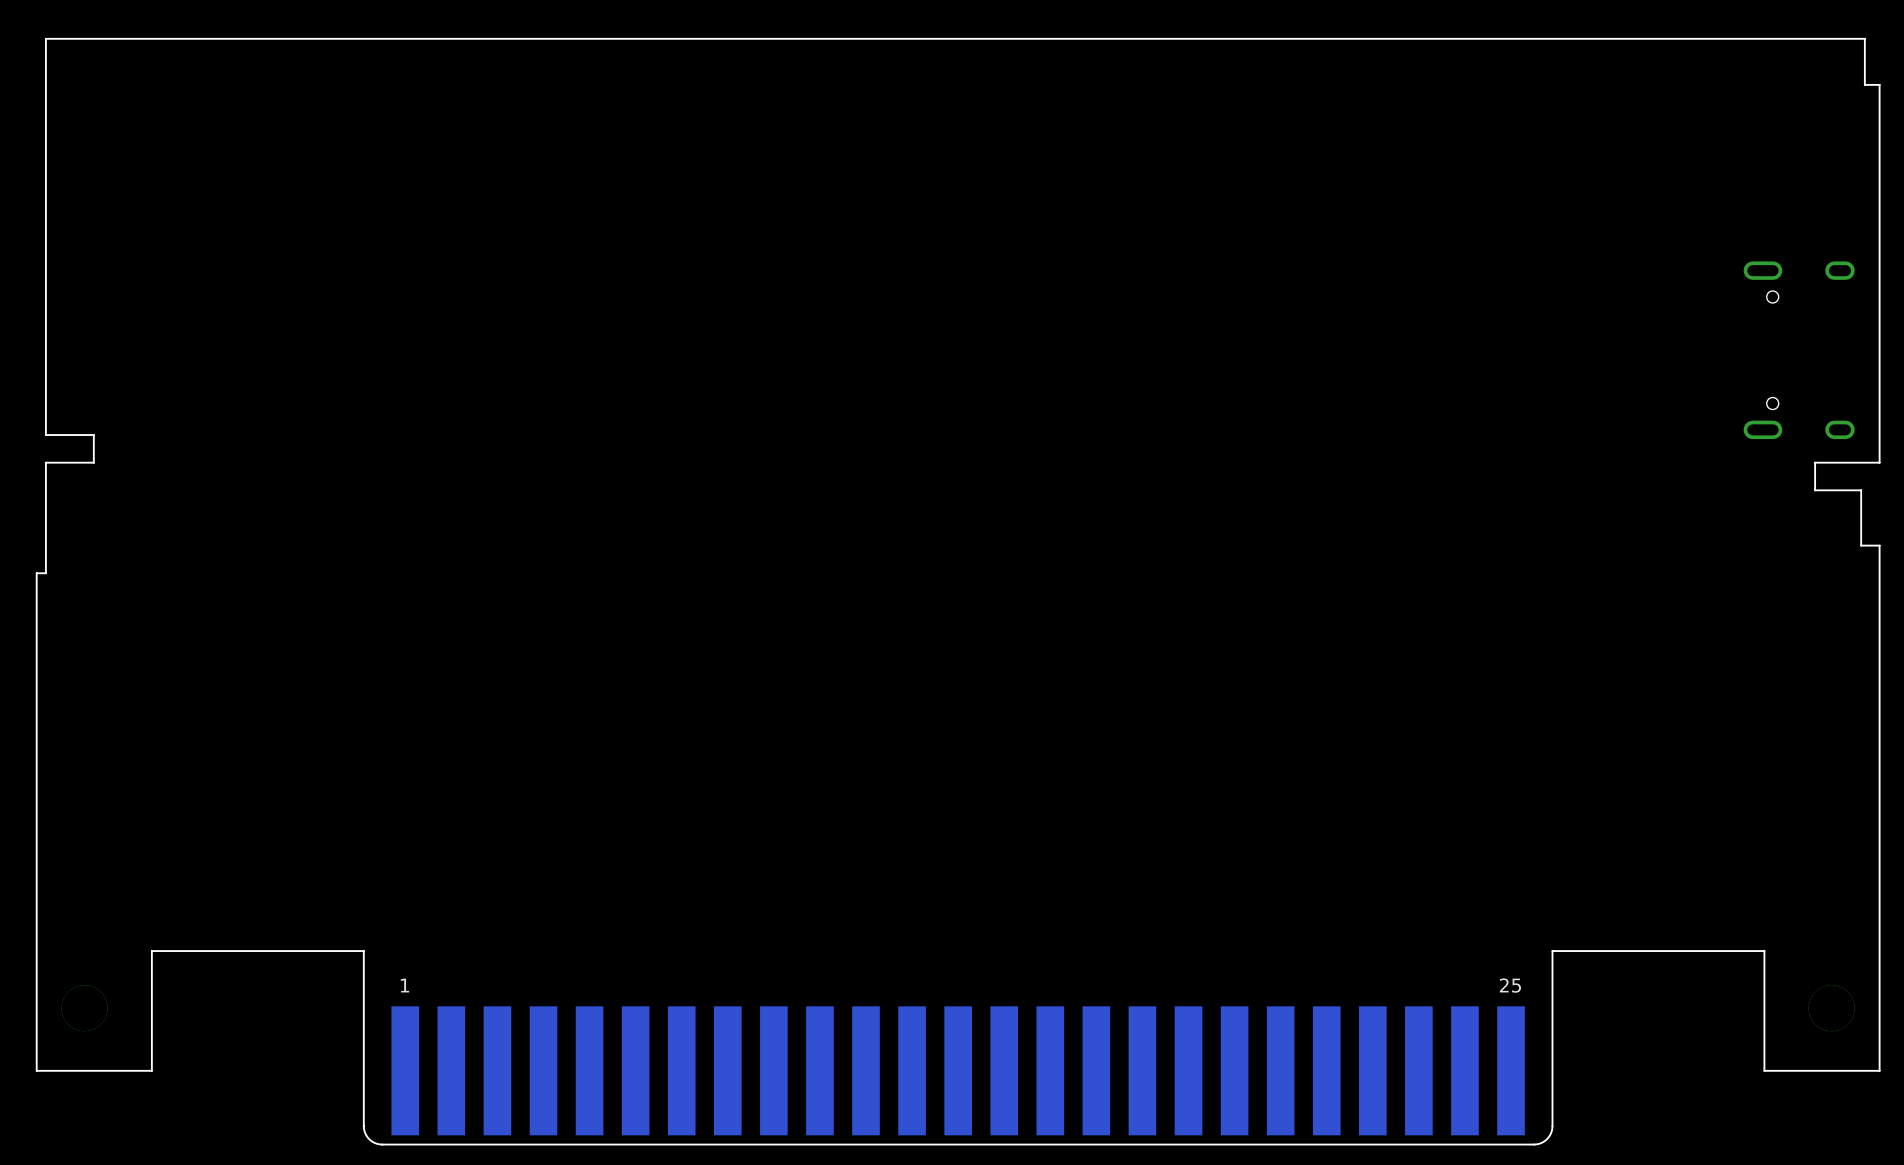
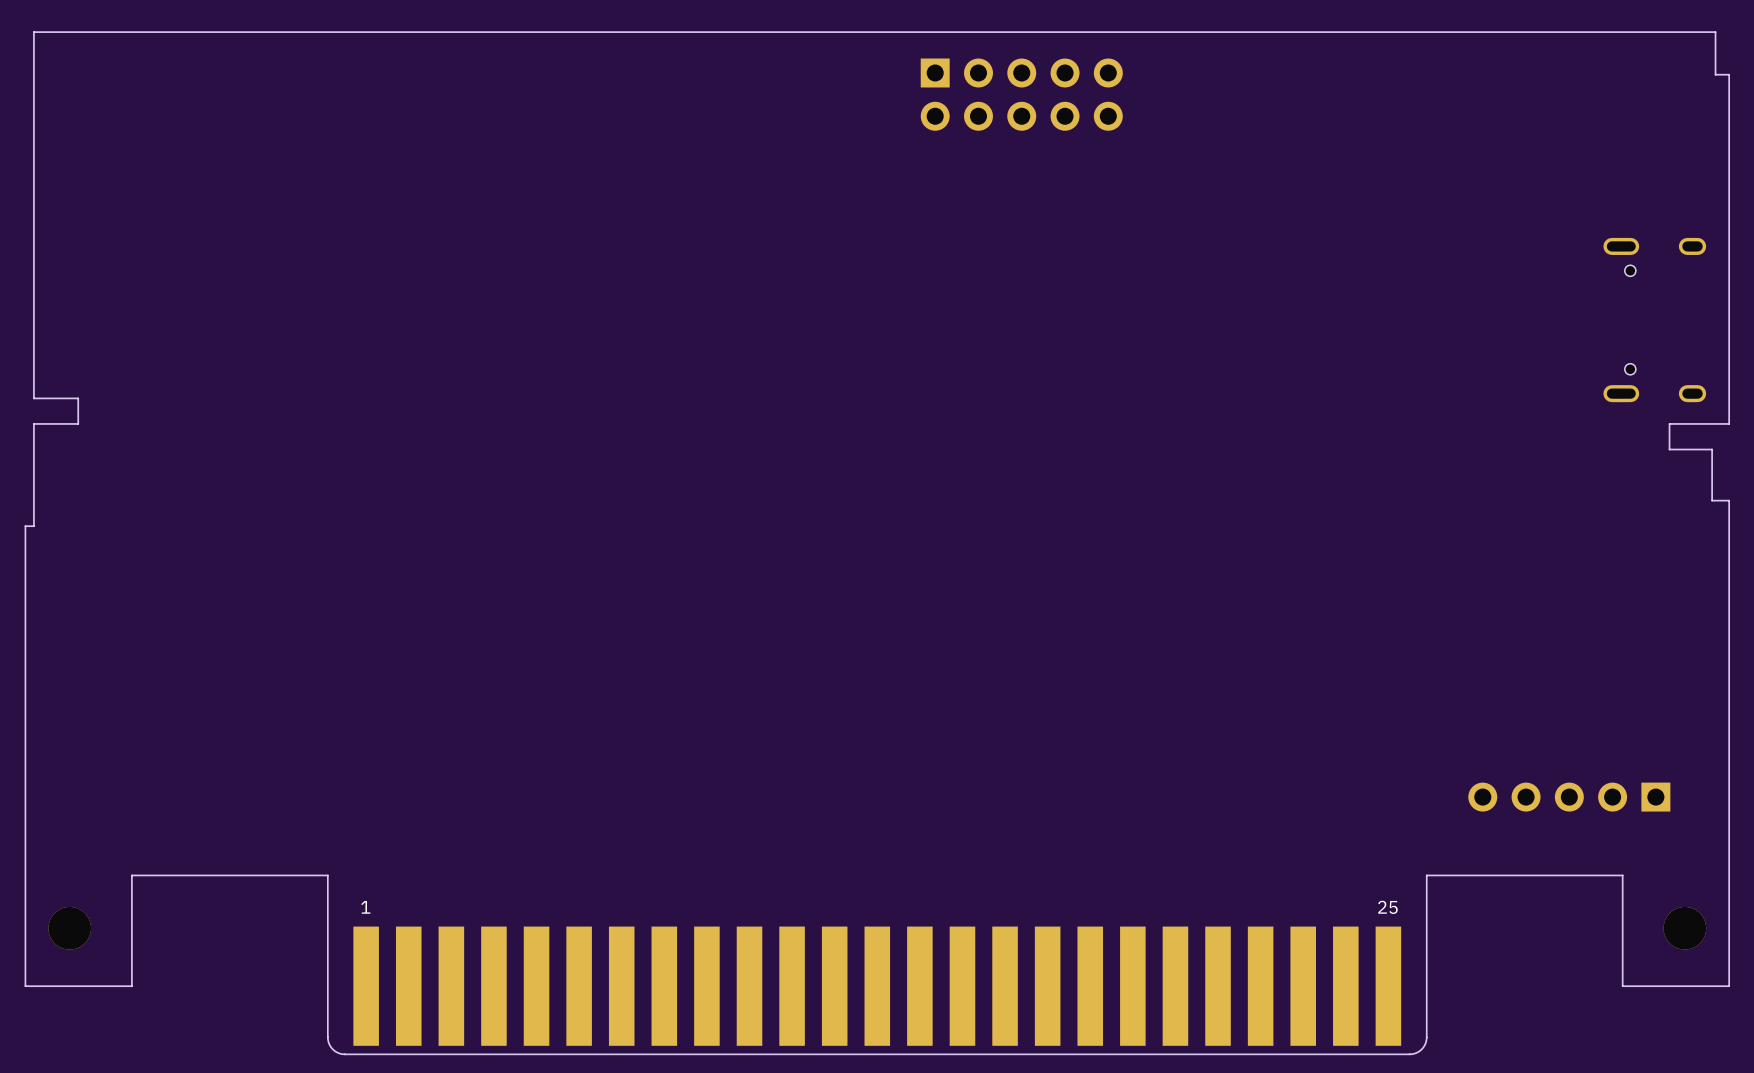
part: none -> (1021, 94)
part: none -> (1569, 797)

